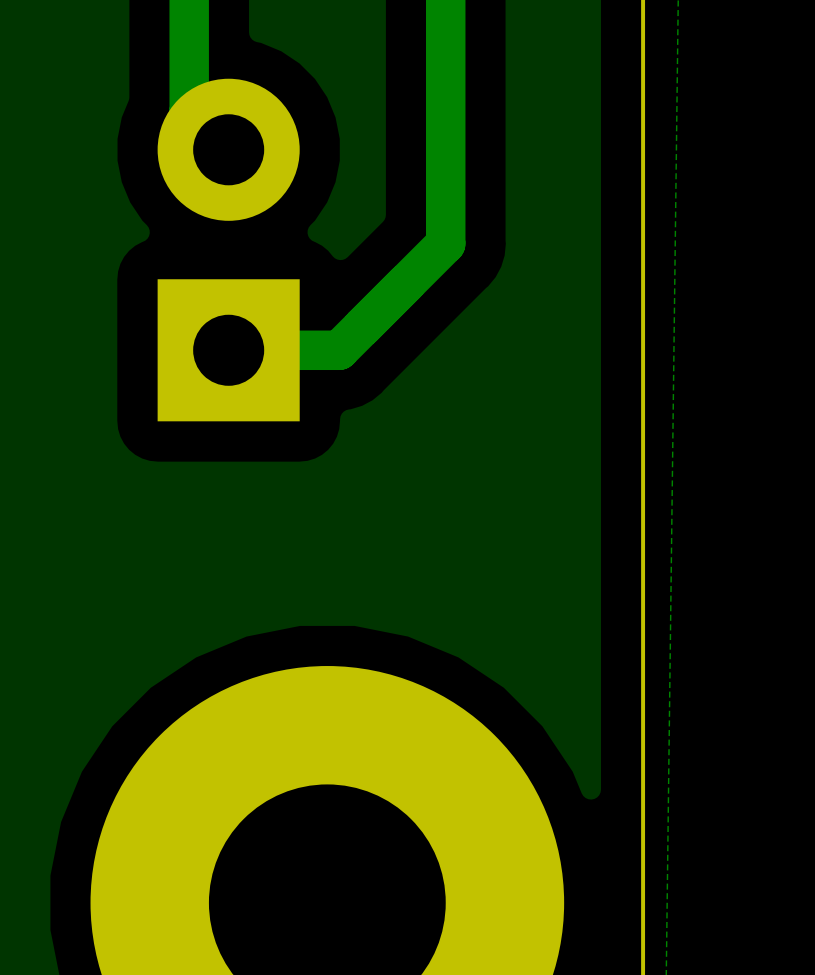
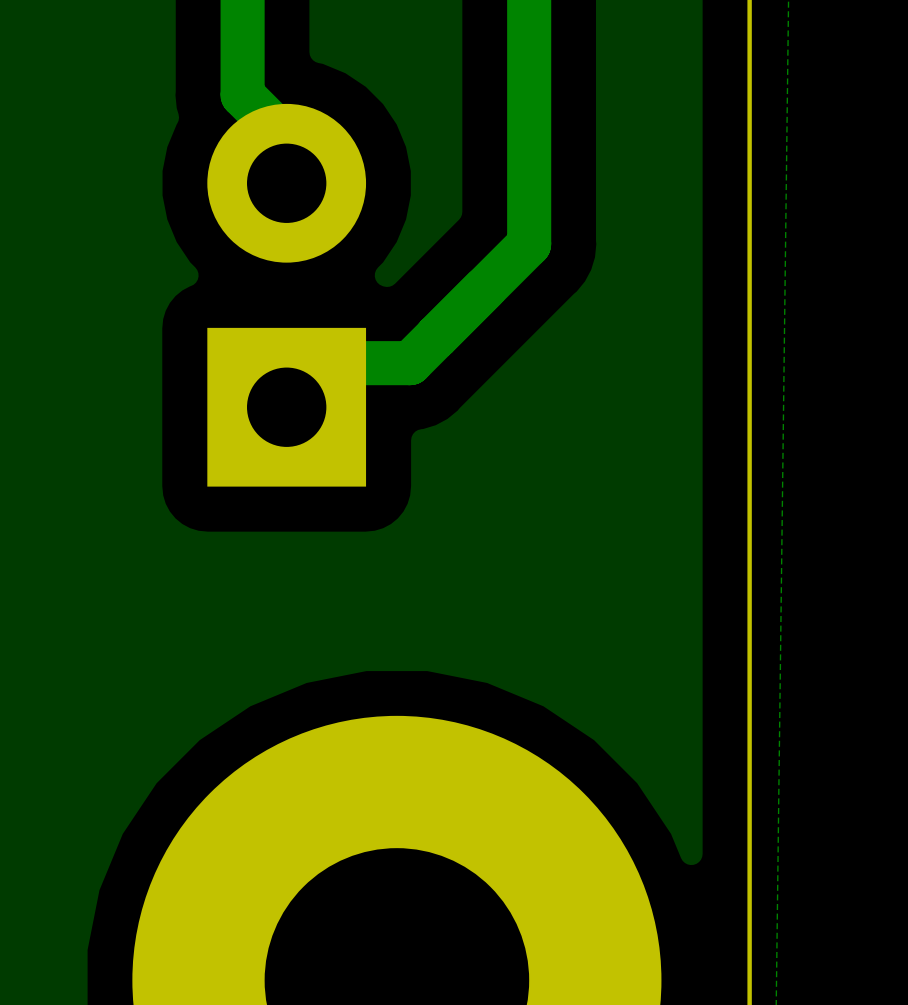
part position: (228, 250) -> (286, 295)

